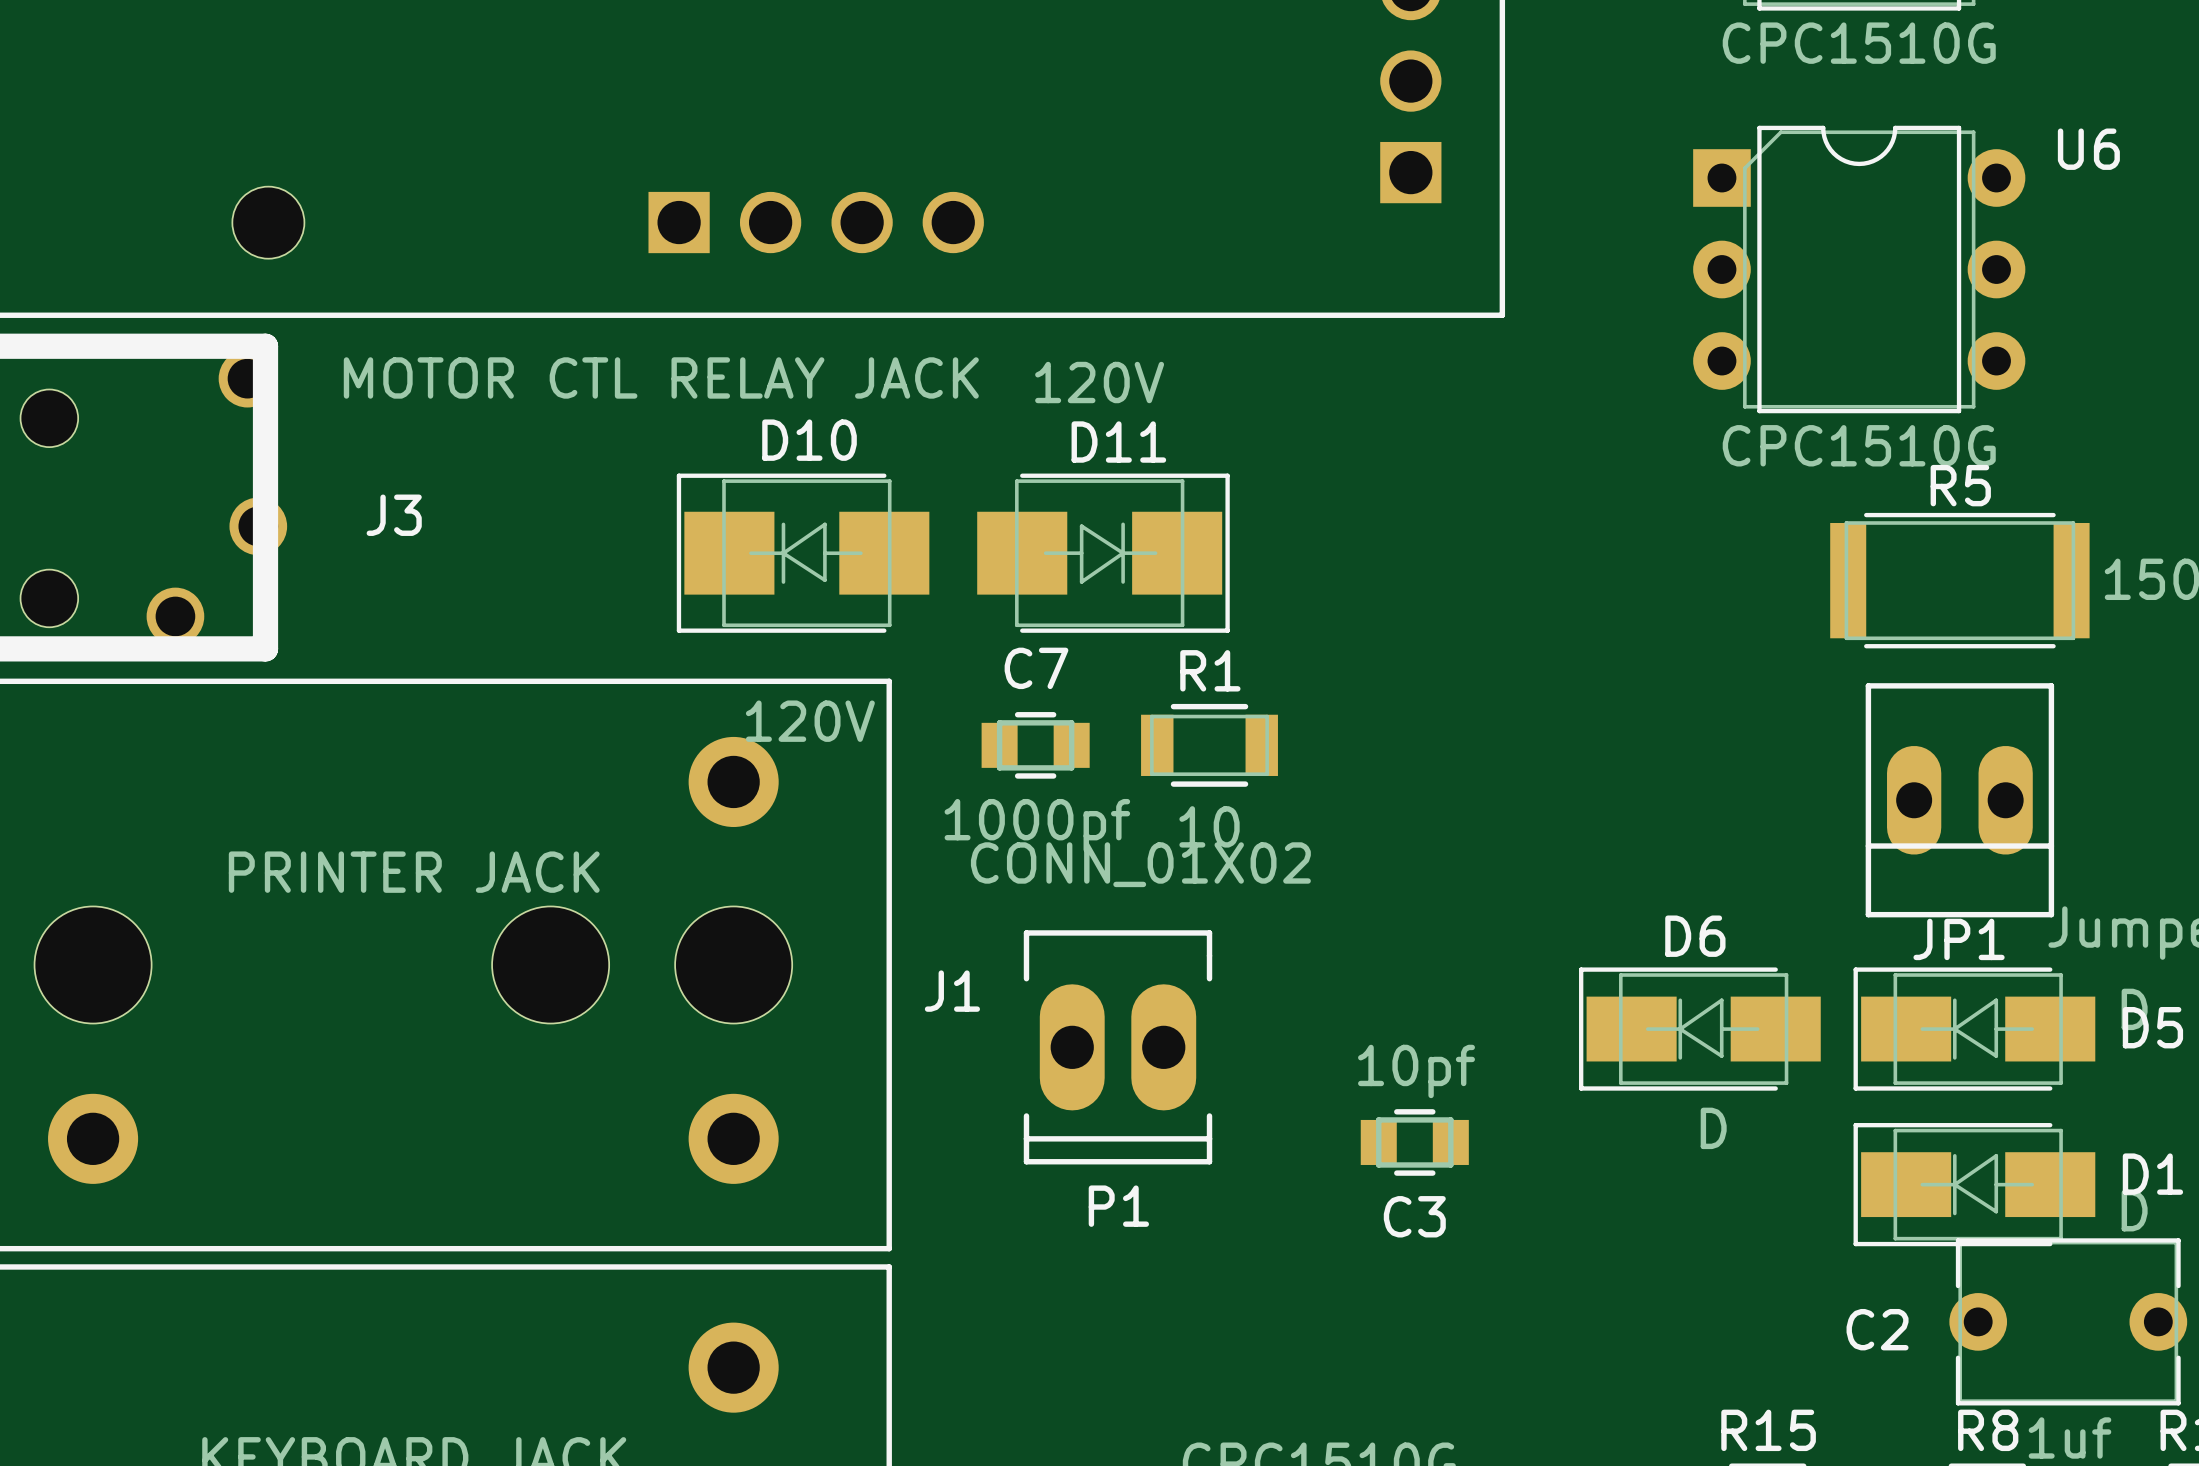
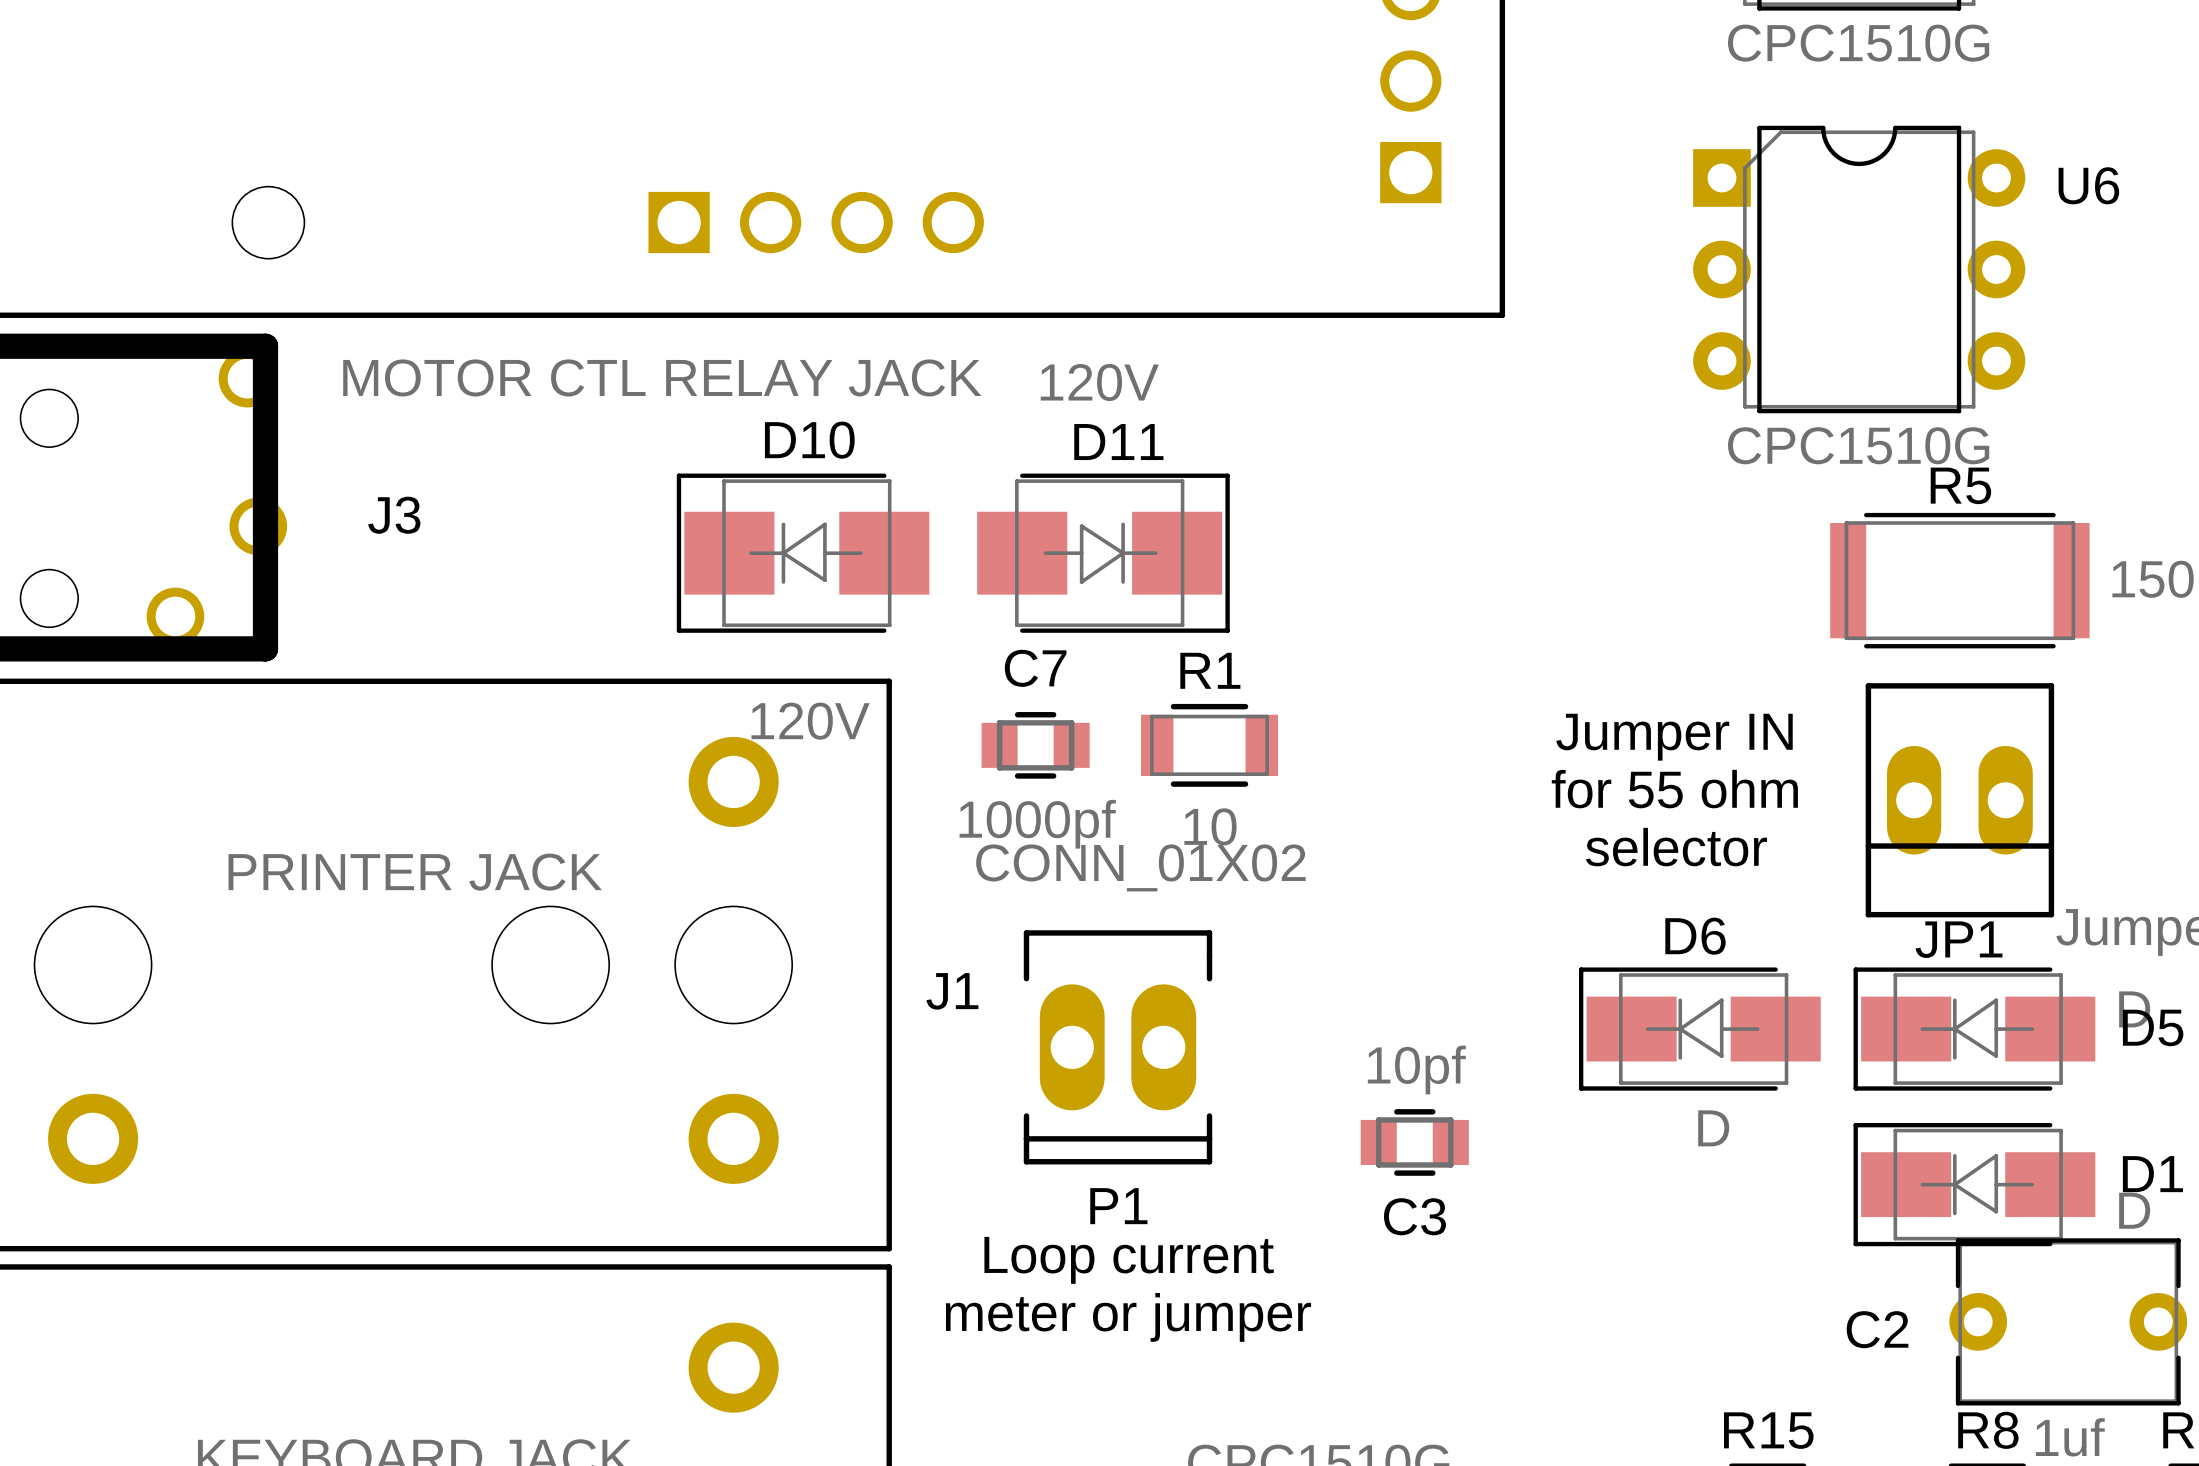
U6 name position: U6 (2088, 149) -> U6 (2088, 185)
text: none -> Jumper IN (1674, 737)
text: none -> for 55 ohm (1674, 789)
text: none -> selector (1676, 847)
text: none -> Loop current (1129, 1260)
text: none -> meter or jumper (1128, 1317)

